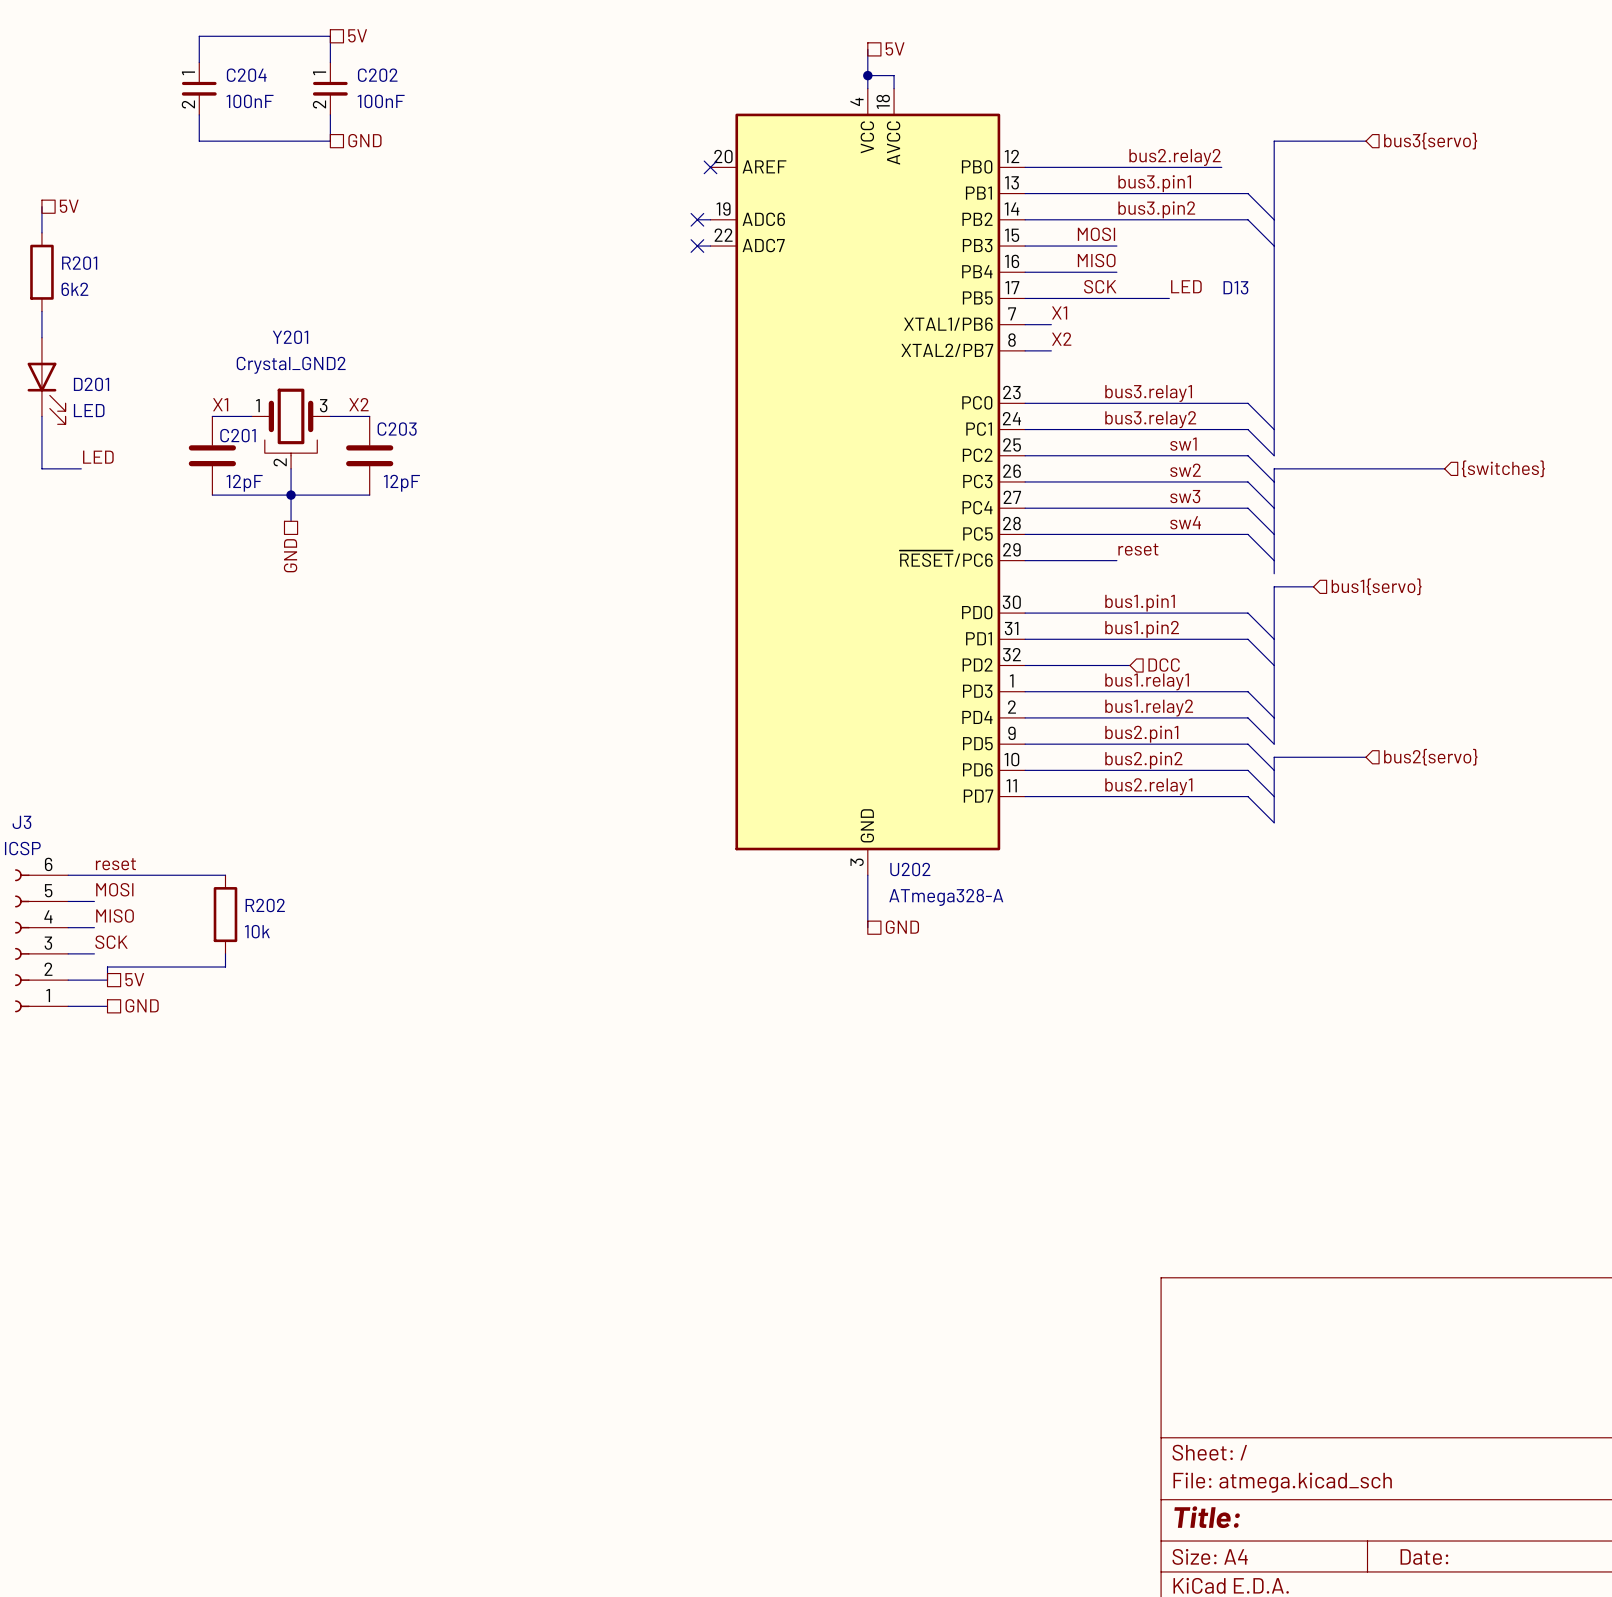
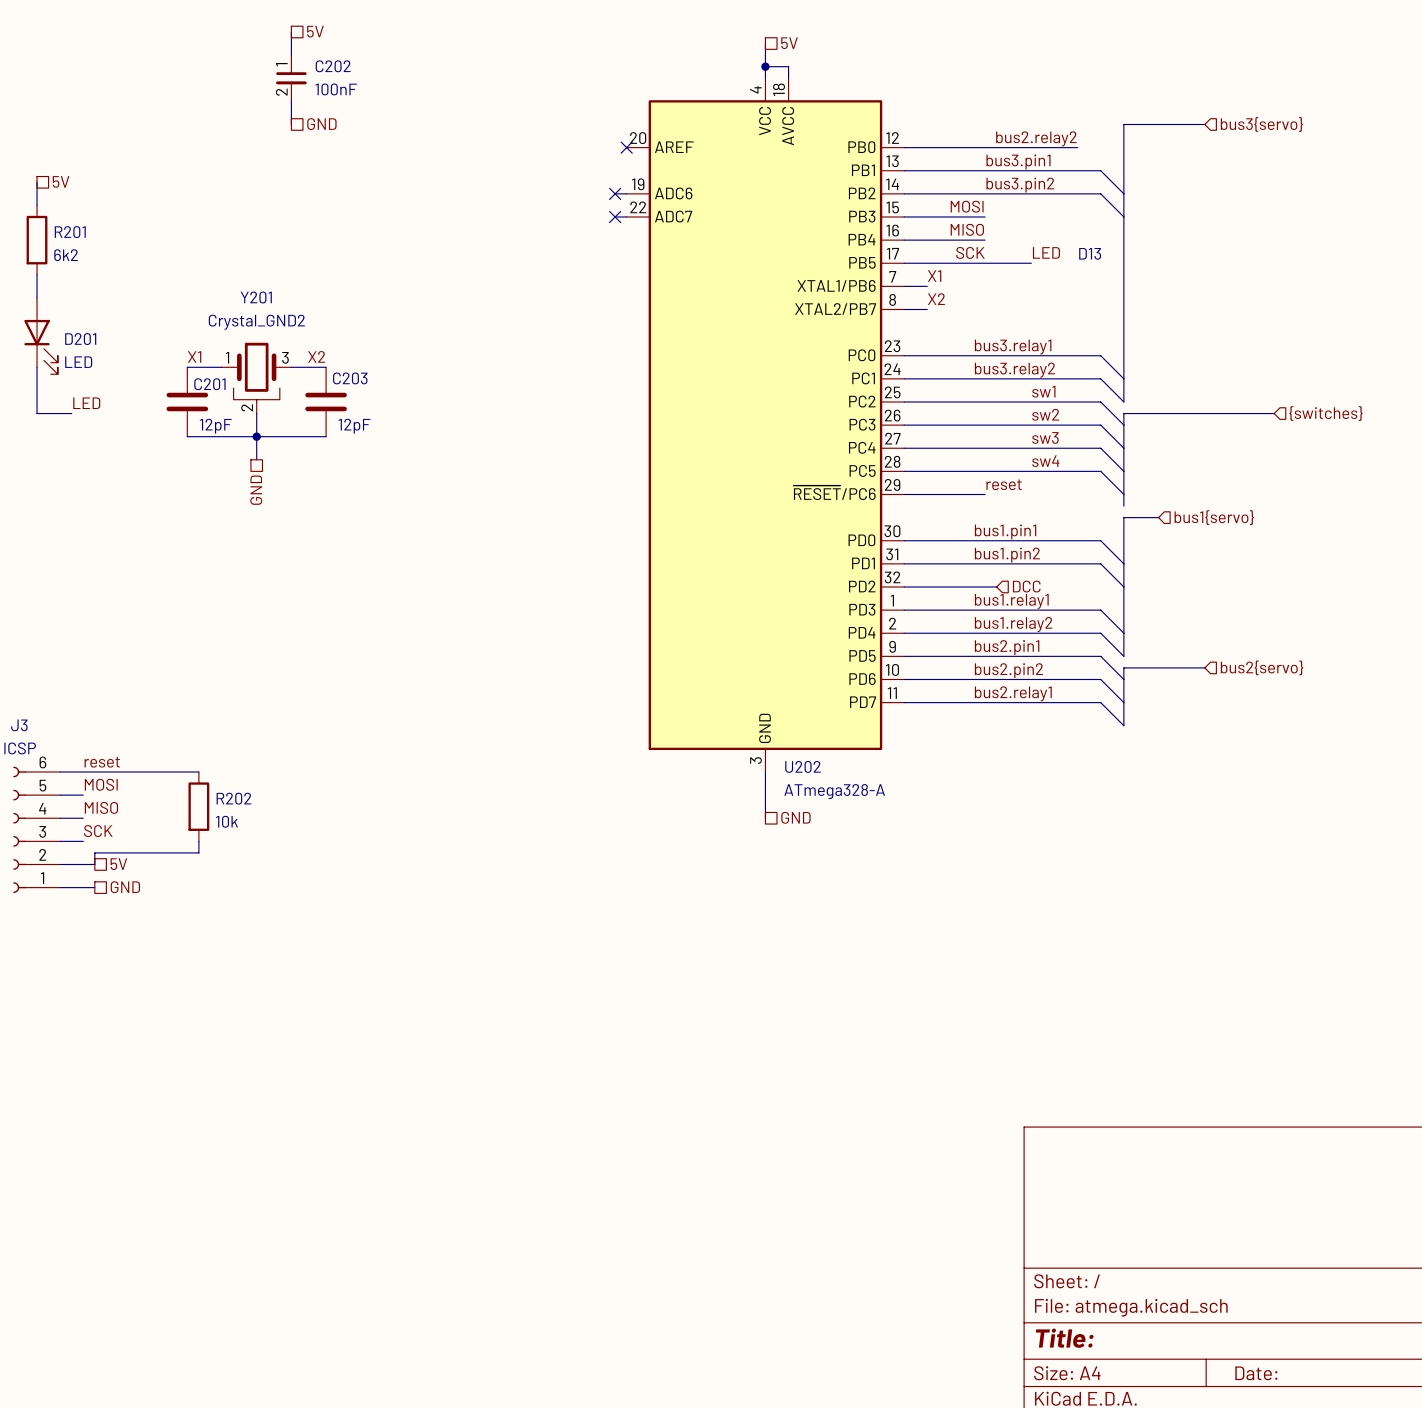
wire: (330, 36) (199, 36) (199, 62) -> none
C204: 100nF (199, 88) -> none
wire: (199, 114) (199, 141) (330, 141) -> none

